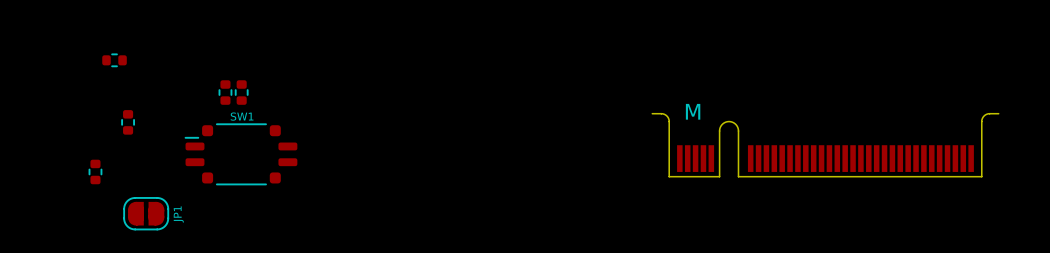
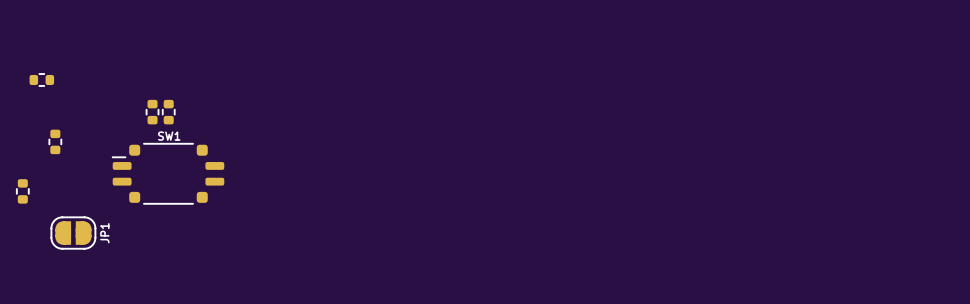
part: (825, 145) -> none

